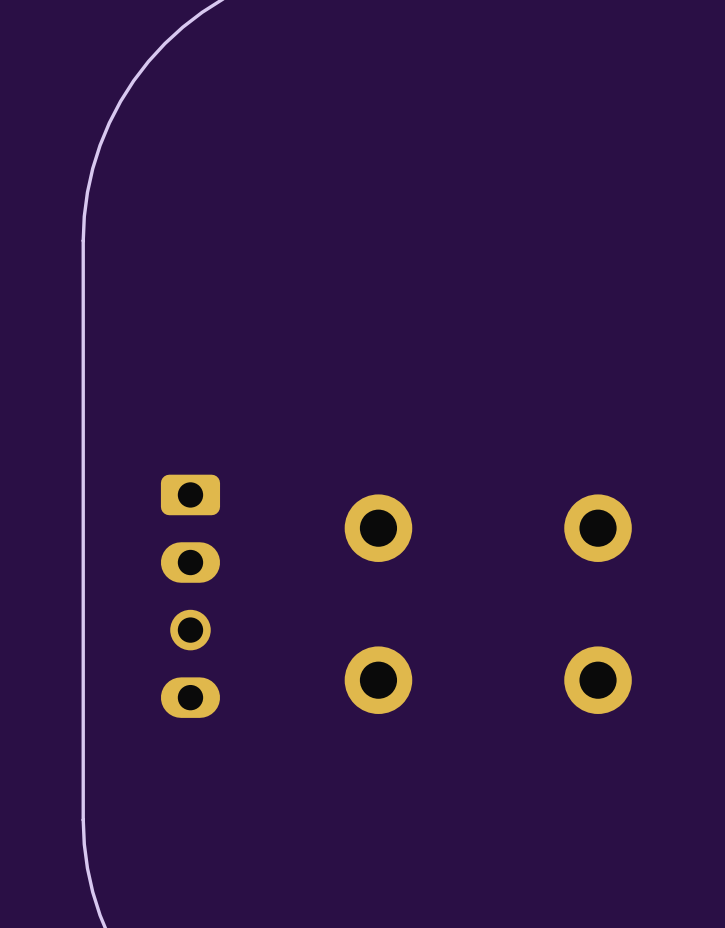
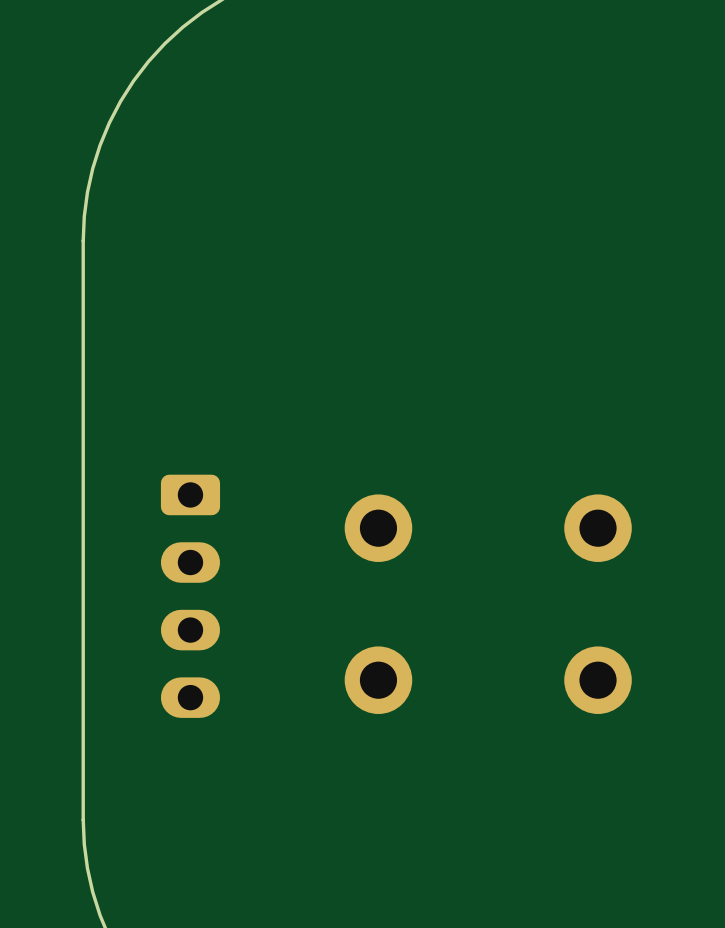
part footprint: [160, 474, 221, 718] -> [160, 474, 221, 718]

